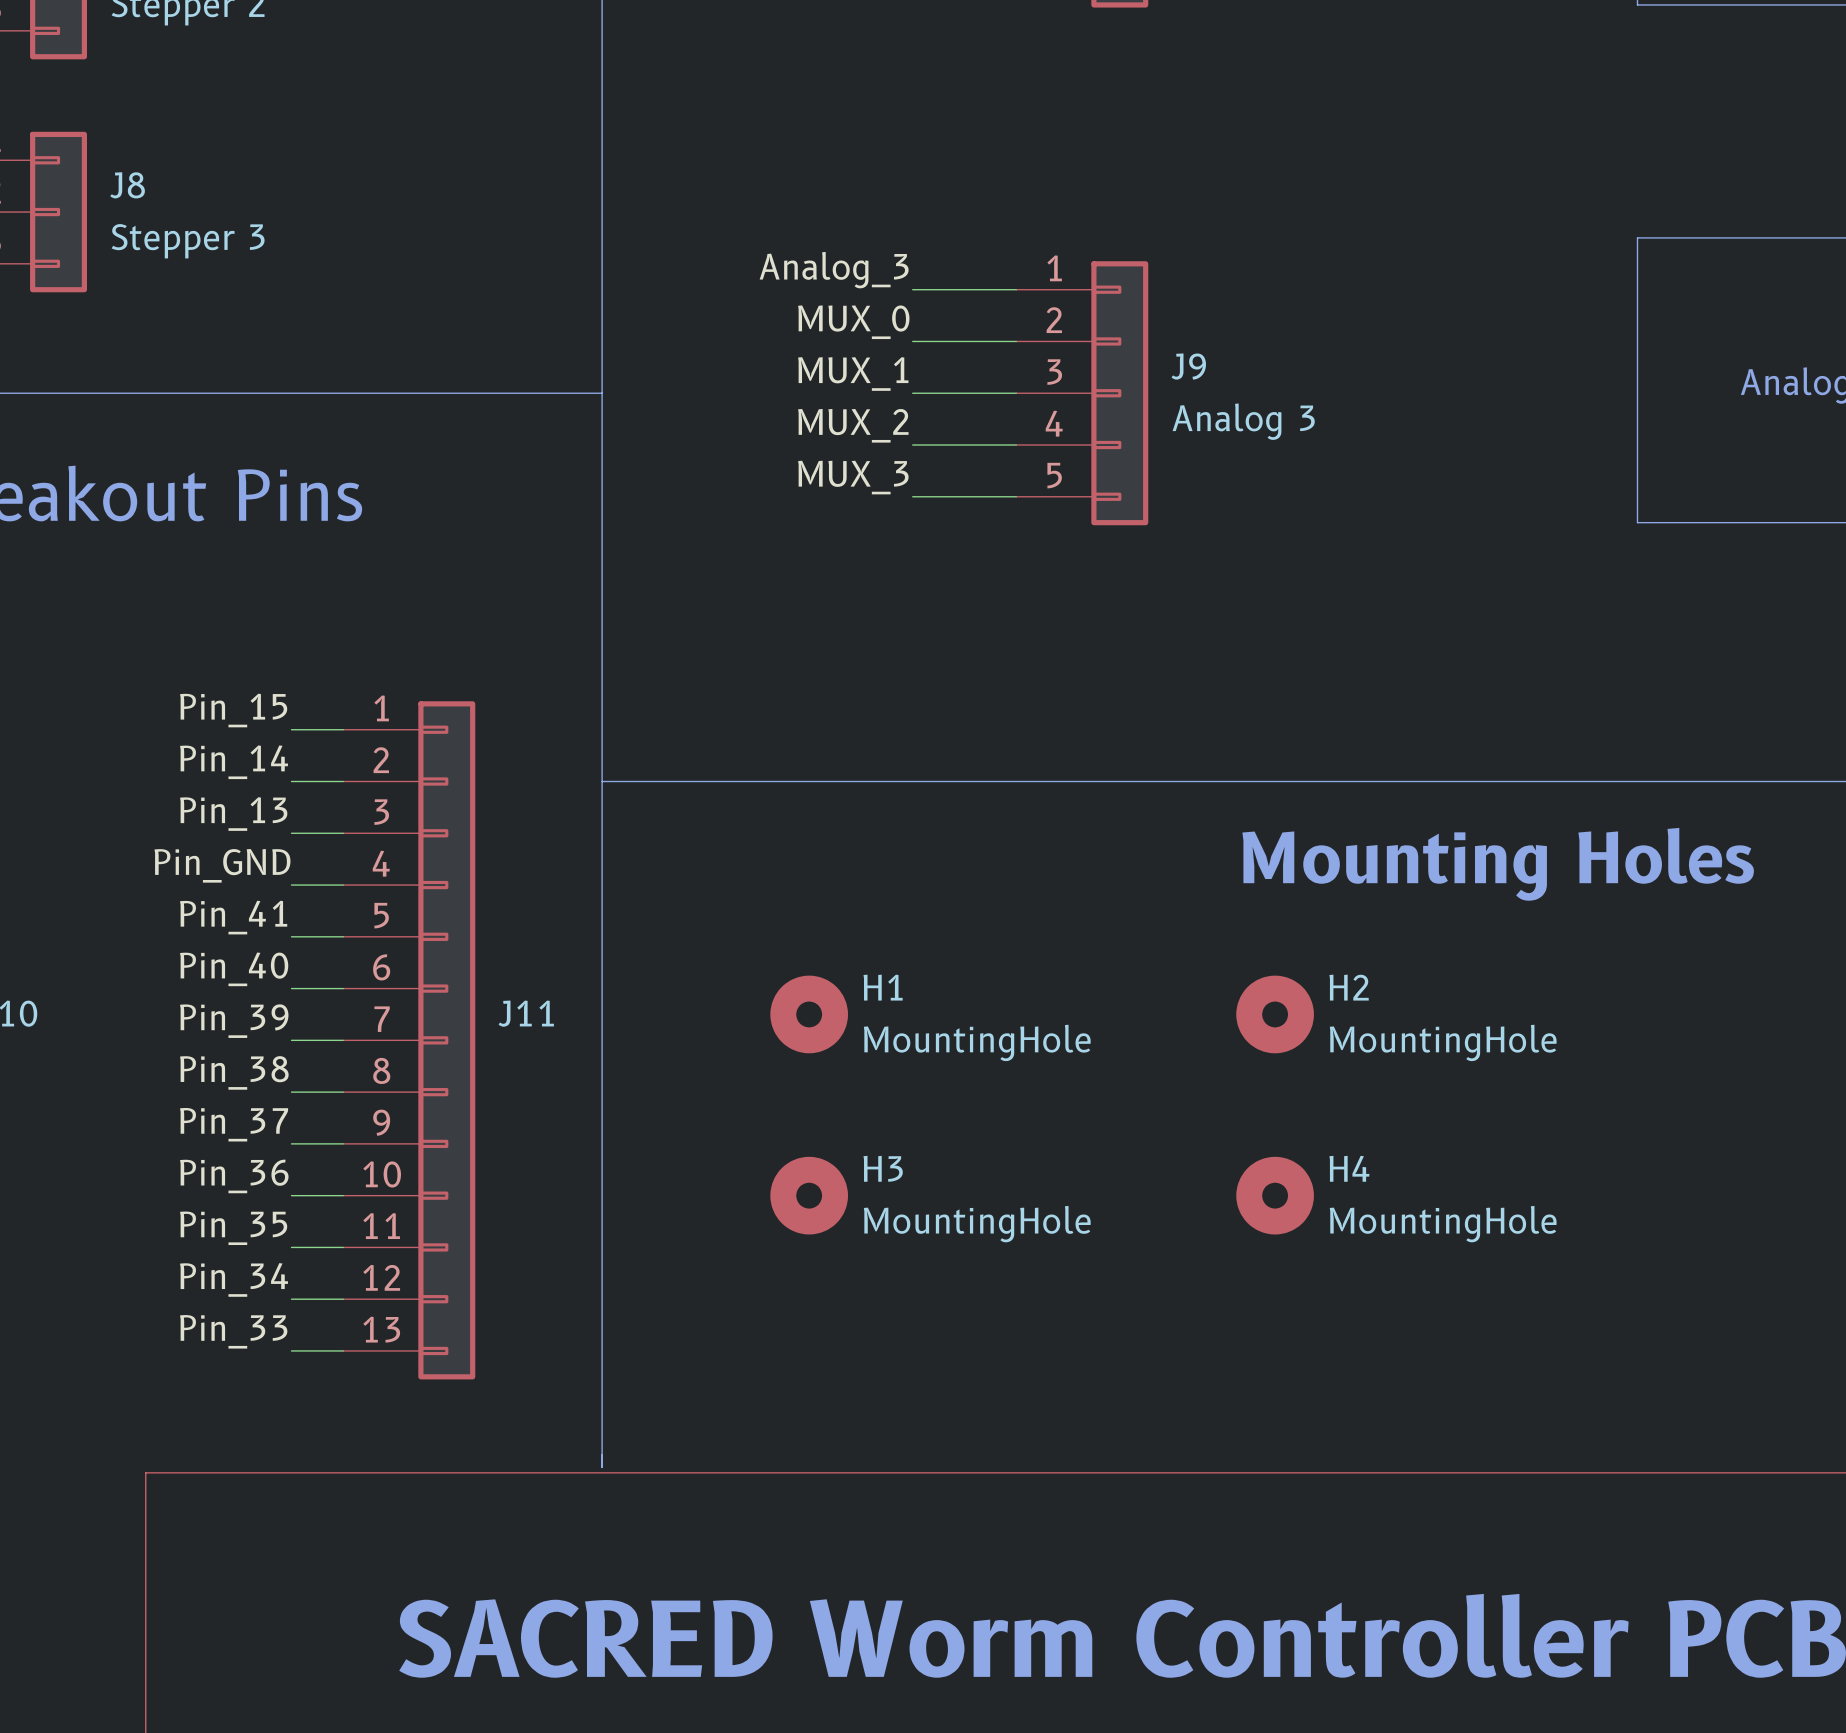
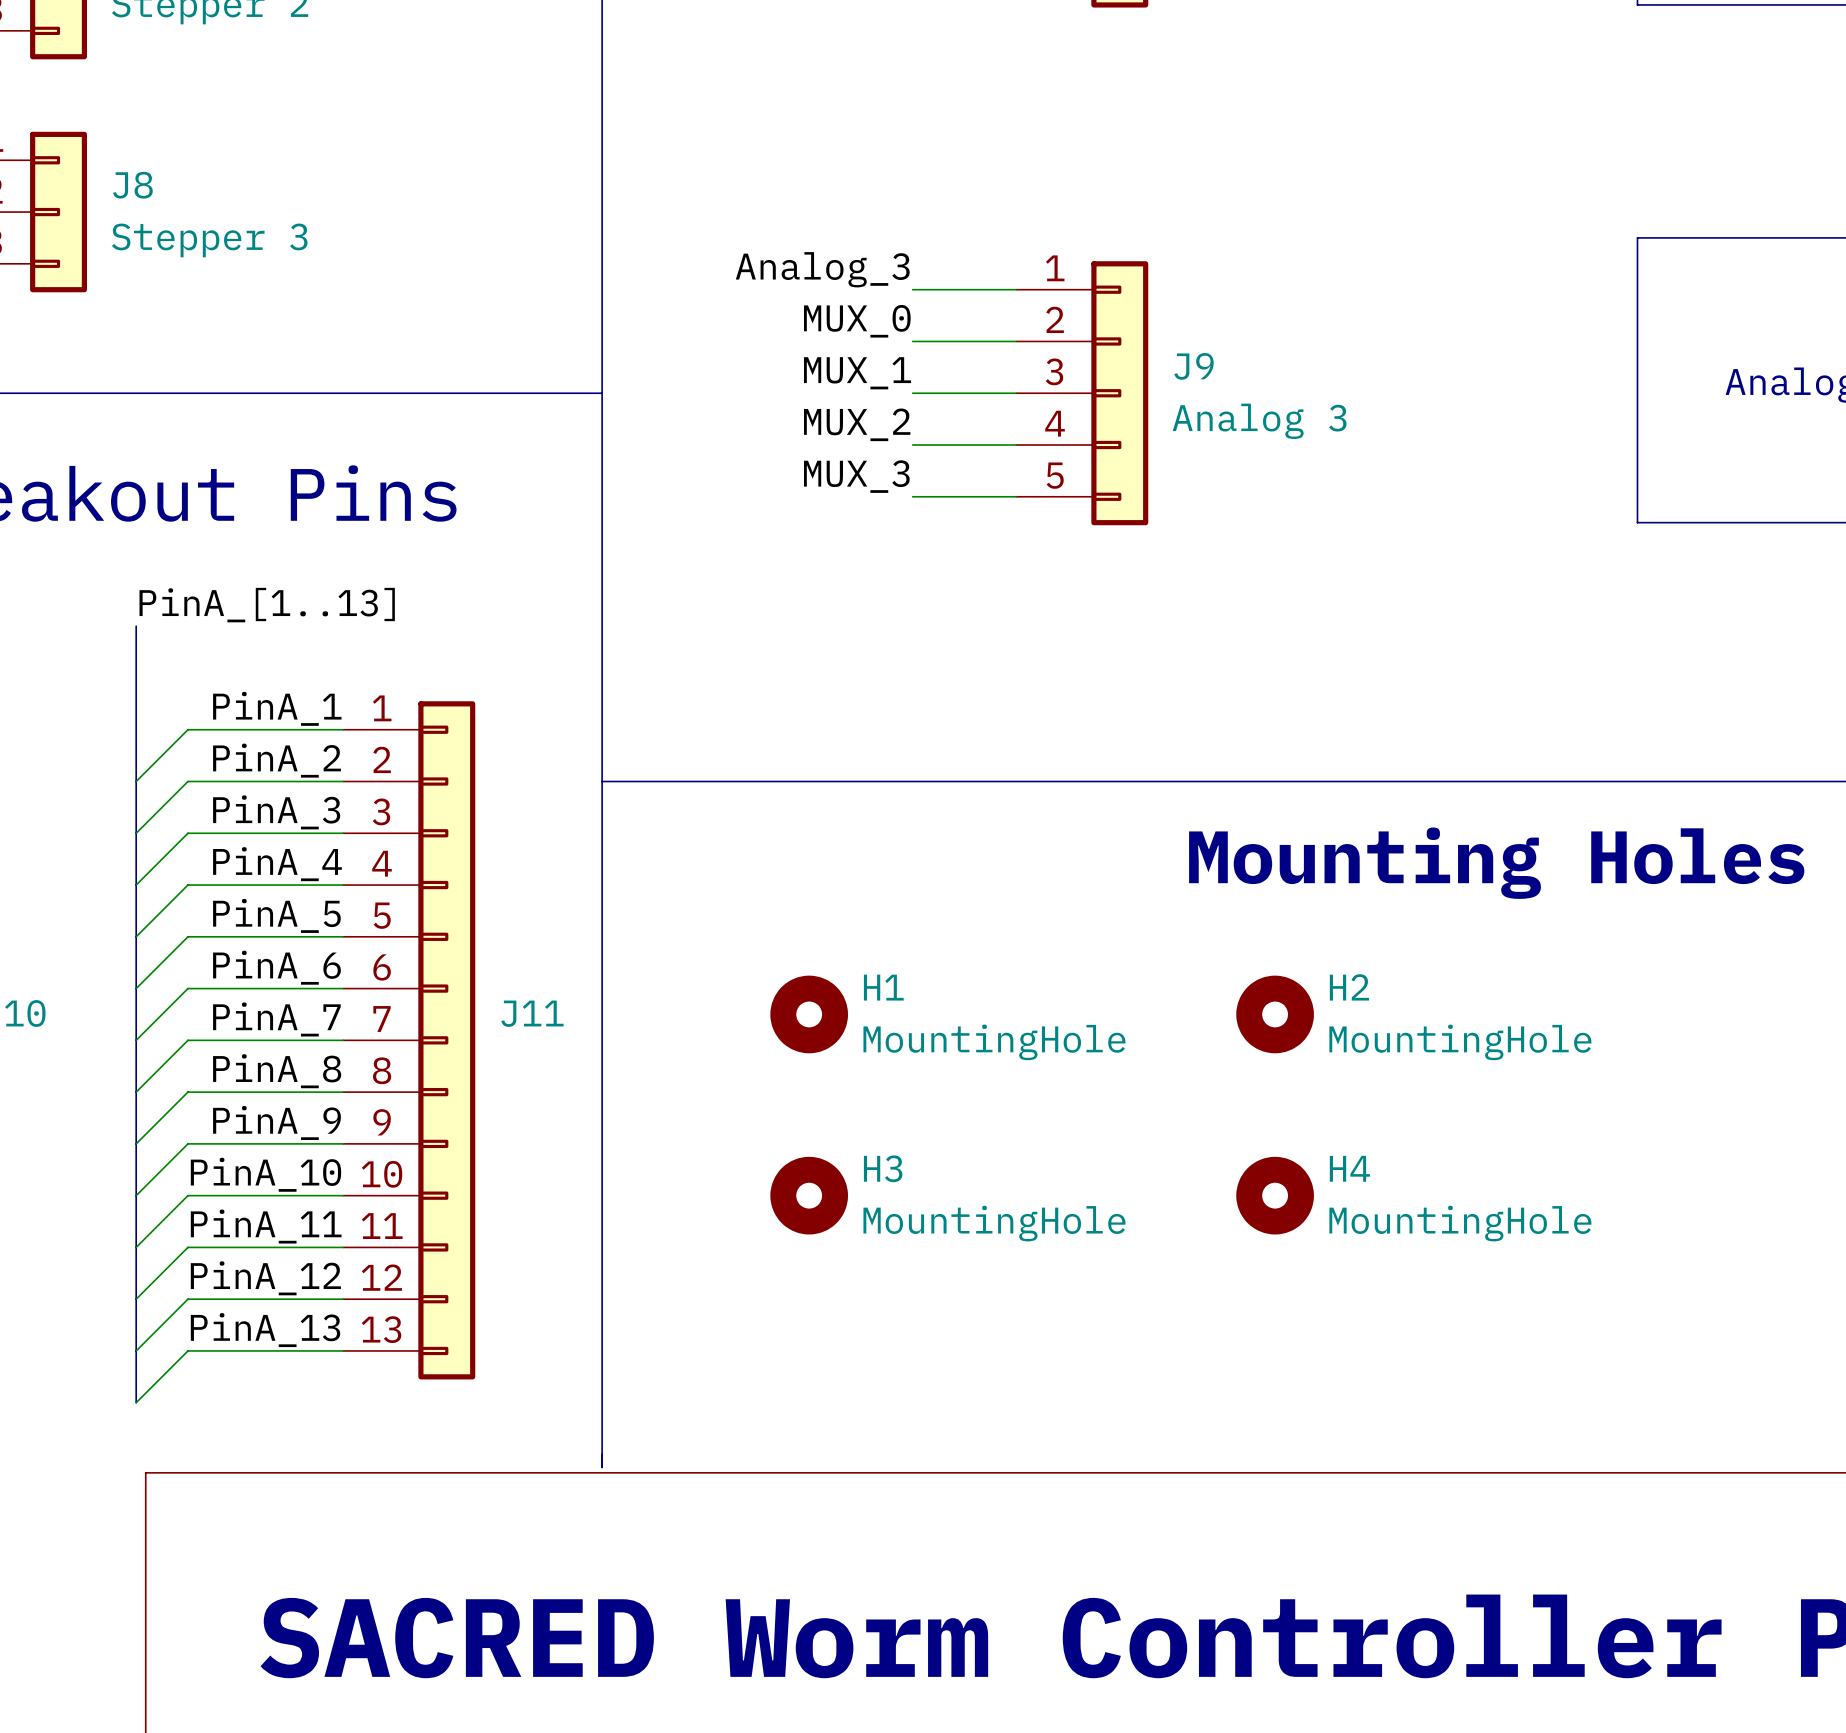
label: none -> PinA_[1..13] (267, 605)
bus: none -> (136, 626) (136, 1402)
label: Pin_15 (233, 710) -> none
label: none -> PinA_1 (277, 708)
wire: none -> (291, 729) (187, 729) (136, 781)
label: Pin_14 (234, 762) -> none
label: none -> PinA_2 (277, 760)
wire: none -> (291, 781) (187, 781) (136, 833)
label: Pin_13 (233, 814) -> none
label: none -> PinA_3 (276, 812)
wire: none -> (291, 833) (187, 833) (136, 885)
label: Pin_GND (222, 865) -> none
label: none -> PinA_4 (277, 864)
wire: none -> (291, 885) (187, 885) (136, 936)
label: Pin_41 (233, 917) -> none
label: none -> PinA_5 (276, 915)
wire: none -> (291, 936) (187, 936) (136, 988)
label: Pin_40 (234, 969) -> none
label: none -> PinA_6 (276, 967)
wire: none -> (291, 988) (187, 988) (136, 1040)
label: Pin_39 (234, 1021) -> none
label: none -> PinA_7 (276, 1019)
wire: none -> (291, 1040) (187, 1040) (136, 1092)
label: Pin_38 (234, 1072) -> none
label: none -> PinA_8 (277, 1071)
wire: none -> (291, 1092) (187, 1092) (136, 1143)
label: Pin_37 (234, 1124) -> none
label: none -> PinA_9 (276, 1123)
wire: none -> (291, 1143) (187, 1143) (136, 1195)
label: Pin_36 (234, 1176) -> none
label: none -> PinA_10 (266, 1174)
wire: none -> (291, 1195) (187, 1195) (136, 1247)
label: Pin_35 (233, 1228) -> none
label: none -> PinA_11 (266, 1226)
wire: none -> (291, 1247) (187, 1247) (136, 1299)
label: Pin_34 (234, 1279) -> none
label: none -> PinA_12 (265, 1278)
wire: none -> (291, 1299) (187, 1299) (136, 1350)
label: Pin_33 (233, 1331) -> none
label: none -> PinA_13 (265, 1330)
wire: none -> (291, 1350) (187, 1350) (136, 1402)

